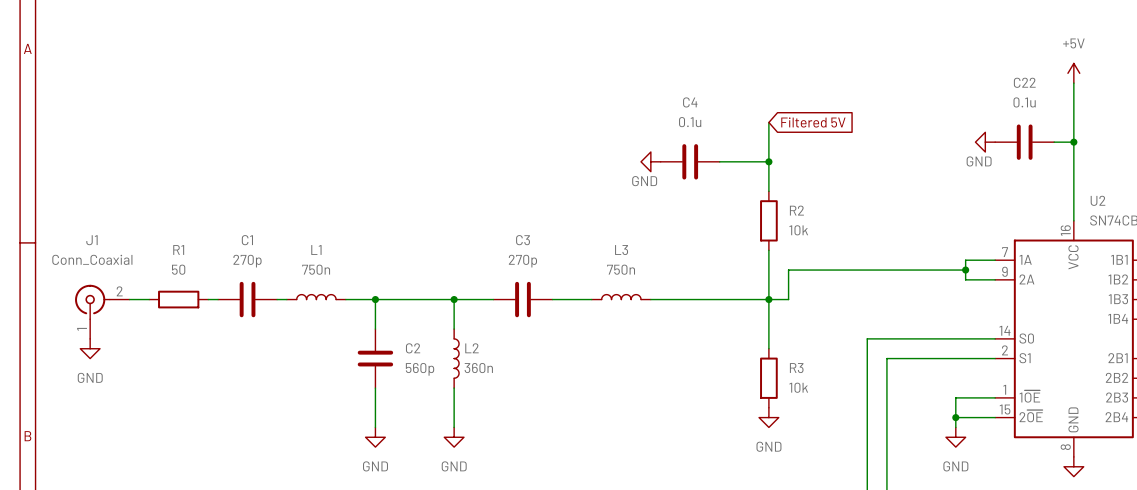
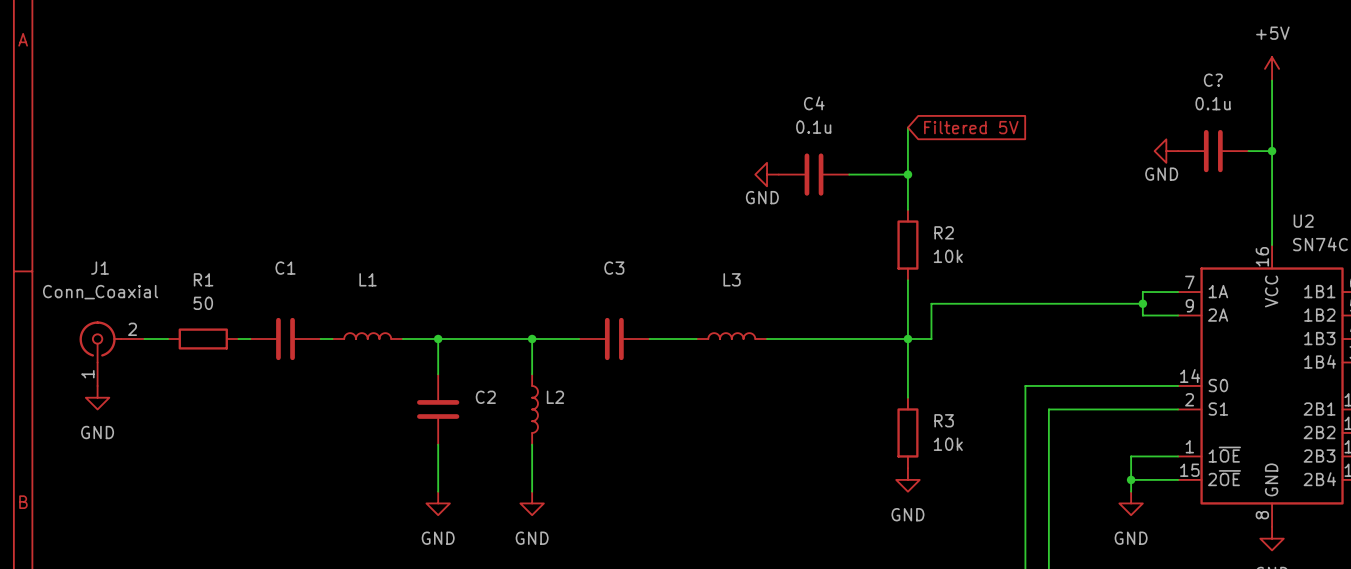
C22 name: C22 (1024, 82) -> C? (1213, 80)
C1 value: 270p (247, 261) -> none
C3 value: 270p (522, 261) -> none
L1 value: 750n (316, 269) -> none
L3 value: 750n (621, 269) -> none
L2 value: 360n (478, 368) -> none
C2 value: 560p (420, 369) -> none

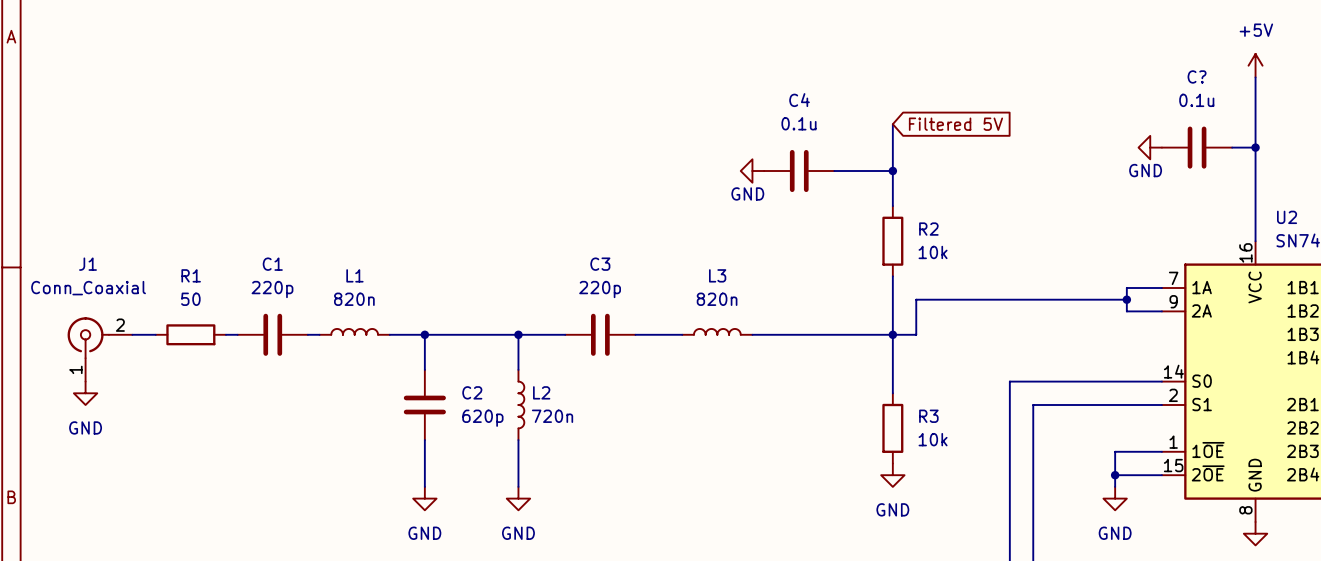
C1 value: none -> 220p (272, 289)
C3 value: none -> 220p (600, 289)
L1 value: none -> 820n (354, 299)
L3 value: none -> 820n (717, 299)
L2 value: none -> 720n (552, 416)
C2 value: none -> 620p (482, 418)

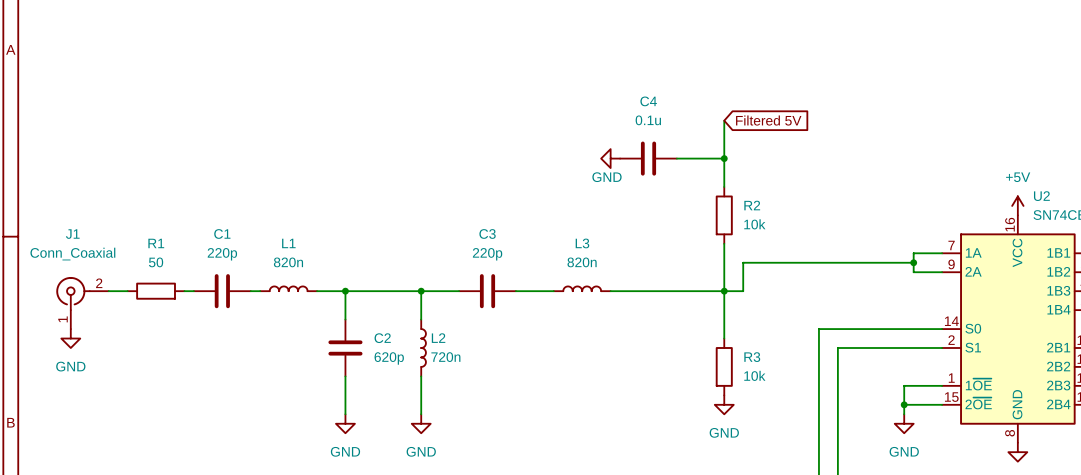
power symbol position: +5V (1255, 65) -> +5V (1017, 205)
wire: (1255, 77) (1255, 241) -> none
power symbol: GND (1150, 147) -> none
C?: 0.1u (1197, 147) -> none
wire: (1232, 147) (1255, 147) -> none
junction: (1255, 147) -> none

